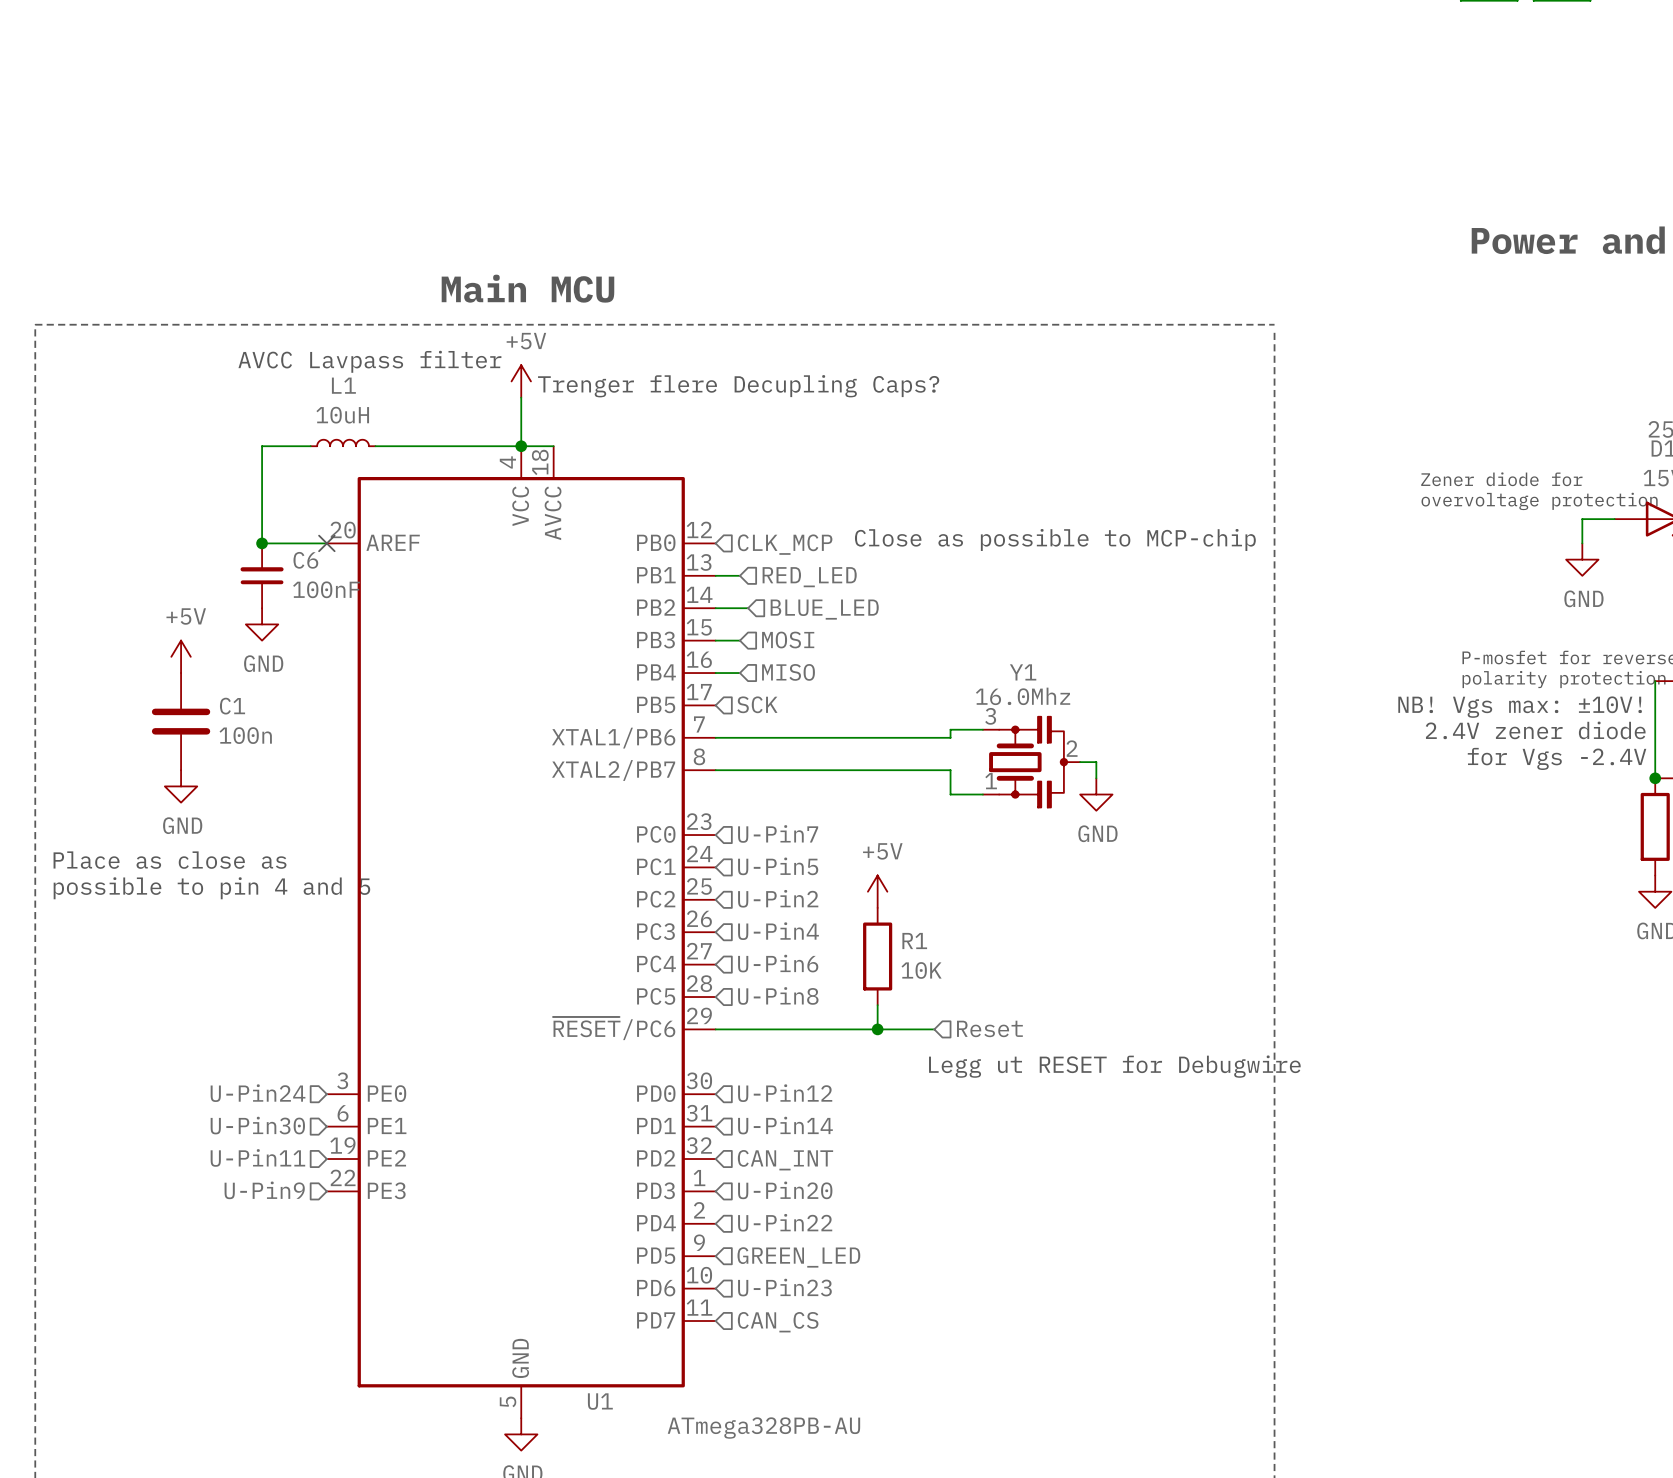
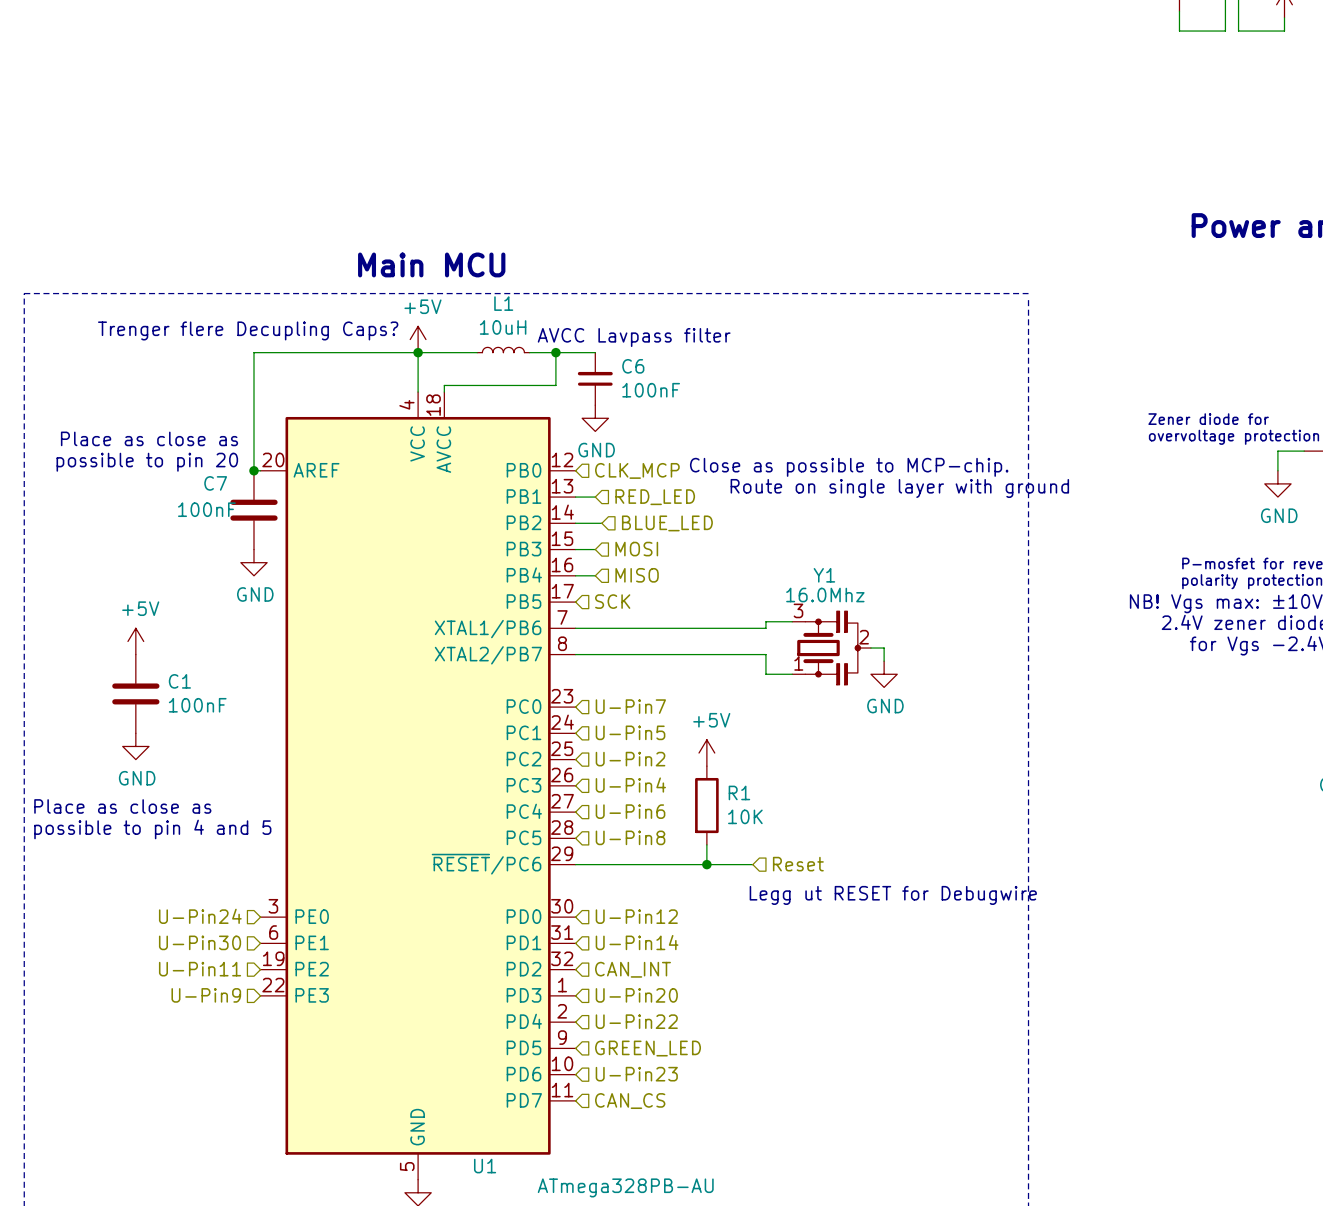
text: AVCC Lavpass filter (369, 361) -> none
text: none -> Trenger flere Decupling Caps? (248, 330)
text: none -> AVCC Lavpass filter (634, 337)
text: Trenger flere Decupling Caps? (738, 386) -> none
wire: none -> (529, 352) (595, 352)
junction: none -> (555, 352)
L1 position: (343, 442) -> (503, 350)
wire: (310, 446) (262, 446) (262, 543) (318, 543) -> (477, 352) (253, 352) (253, 470)
wire: (375, 446) (553, 446) -> (555, 352) (555, 385) (444, 385) (444, 392)
junction position: (521, 446) -> (418, 352)
power symbol: none -> GND (595, 418)
text: none -> Place as close as (149, 438)
text: none -> possible to pin 20 (147, 462)
text: Close as possible to MCP-chip (1055, 539) -> Close as possible to MCP-chip. (849, 467)
junction position: (262, 543) -> (253, 470)
no-connect mark: (326, 543) -> none
text: none -> Route on single layer with ground (899, 488)
C6 position: (262, 575) -> (595, 378)
C7: none -> 100nF (253, 510)
power symbol position: GND (262, 624) -> GND (253, 562)
power symbol position: +5V (181, 656) -> +5V (135, 641)
C1 position: (181, 721) -> (135, 693)
C1 value: 100n (245, 735) -> 100nF (197, 705)
power symbol: GND (181, 786) -> none
text position: Place as close as (169, 860) -> Place as close as (122, 806)
power symbol: none -> GND (135, 746)
text position: possible to pin 4 and 5 (211, 888) -> possible to pin 4 and 5 (152, 829)

